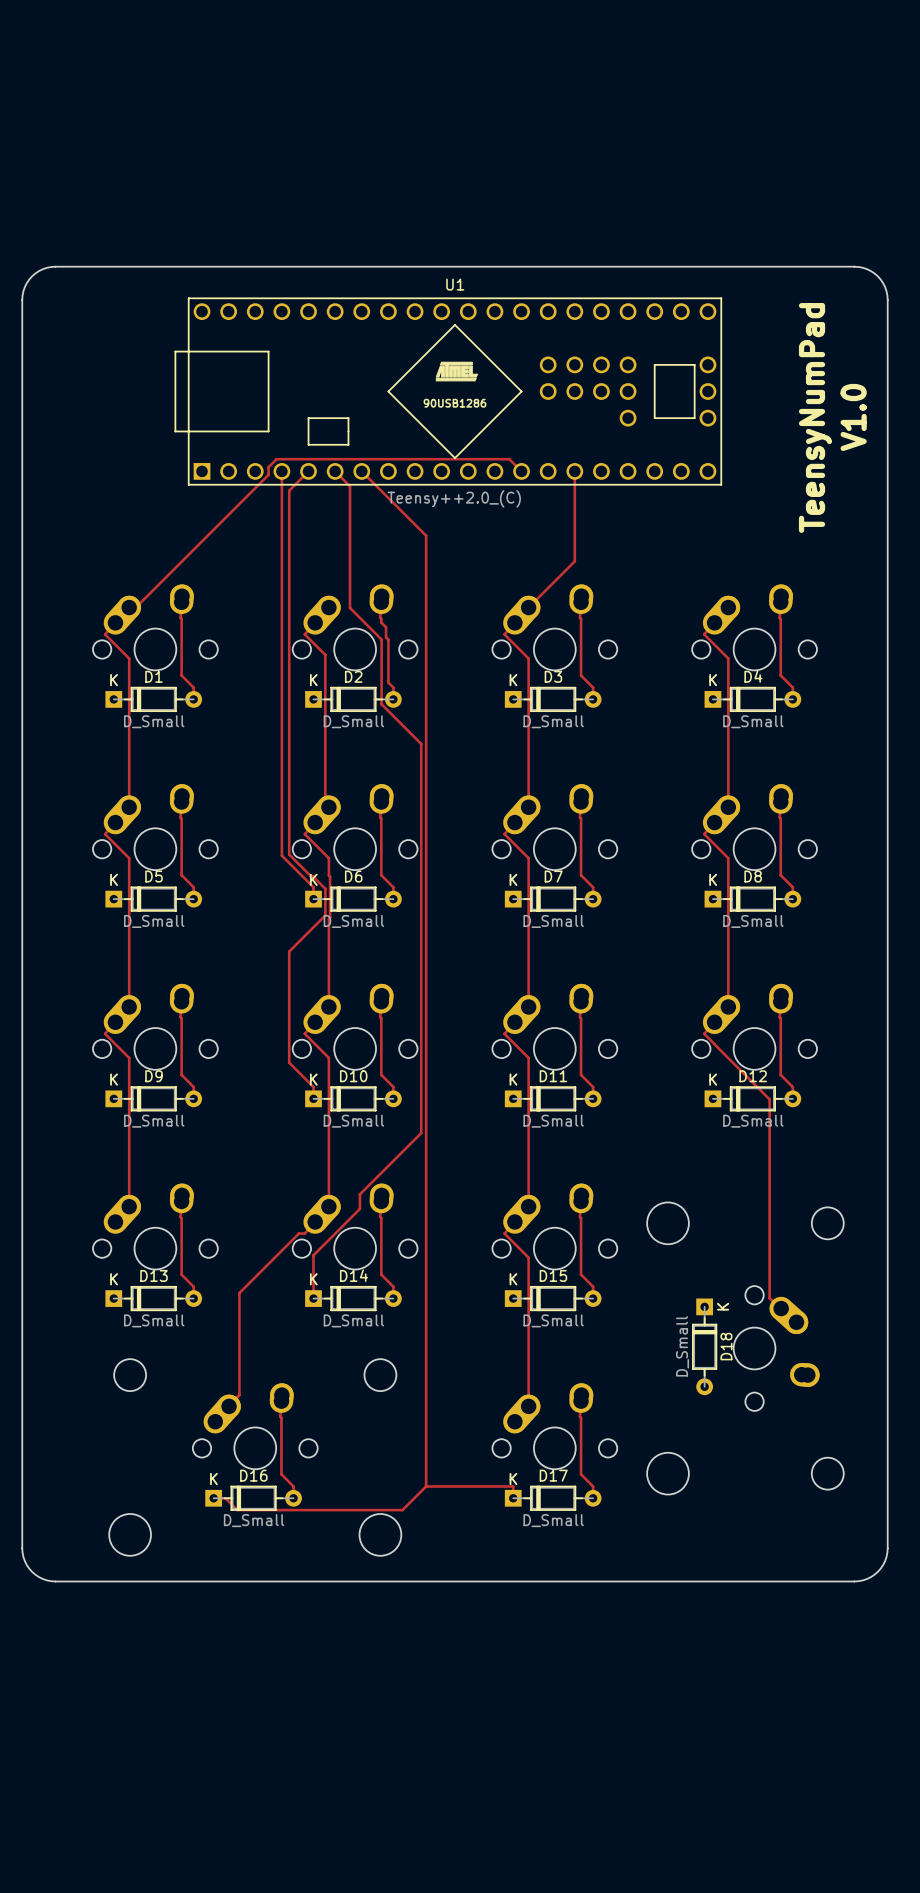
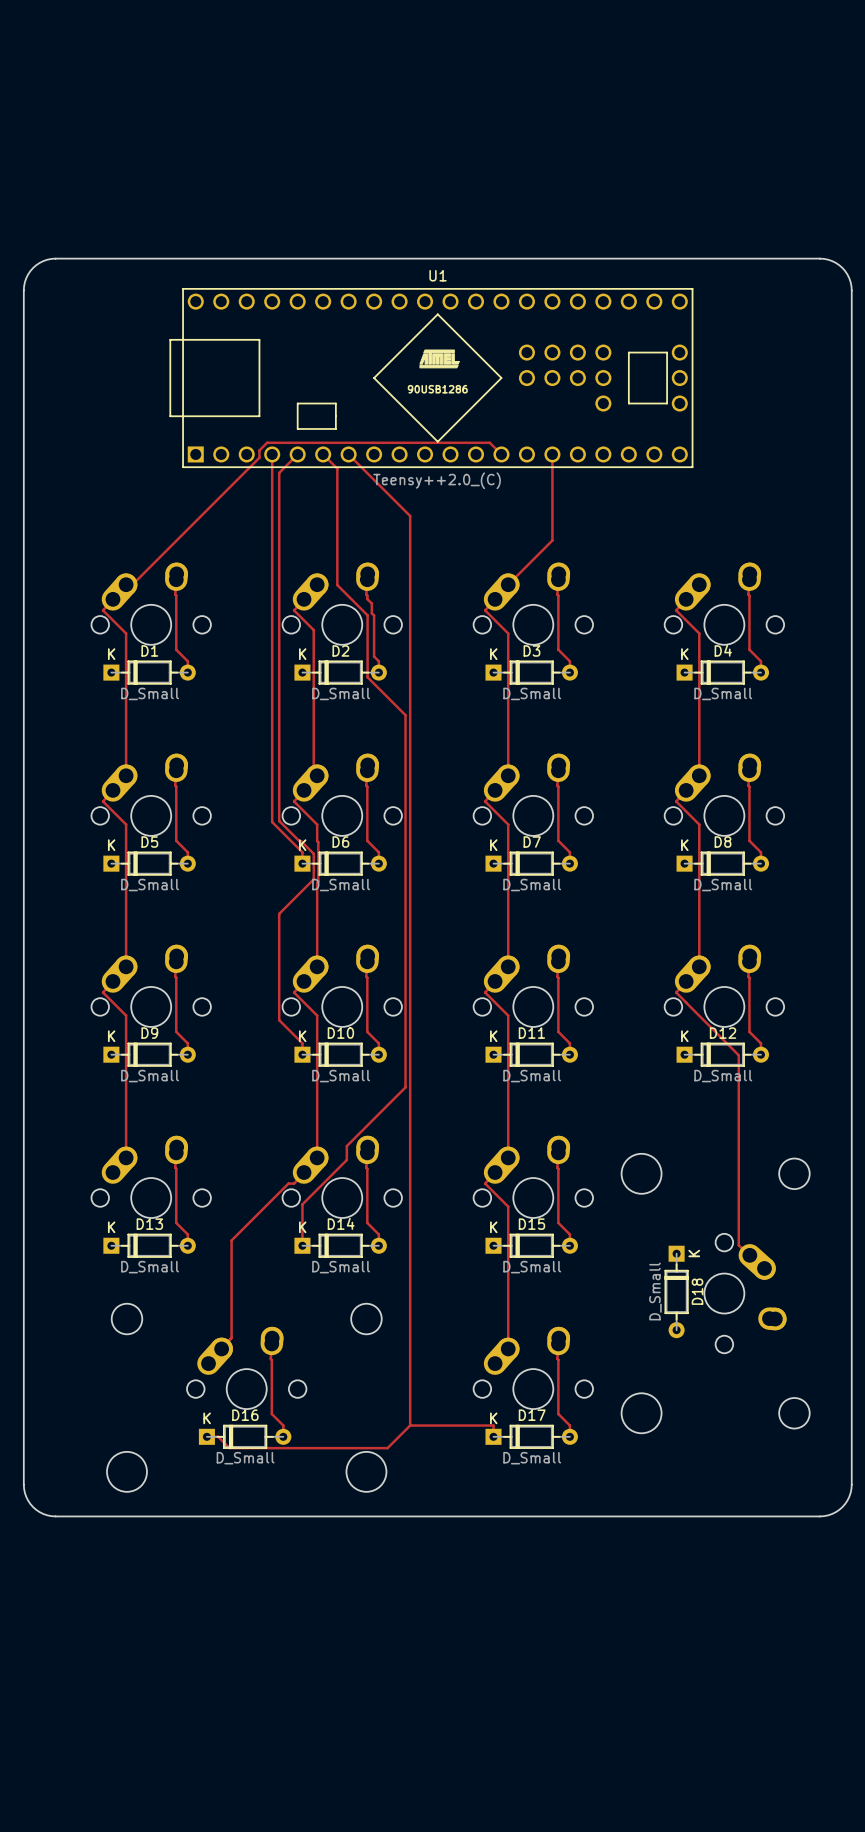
text: TeensyNumPad (815, 417) -> none
text: V1.0 (853, 417) -> none

